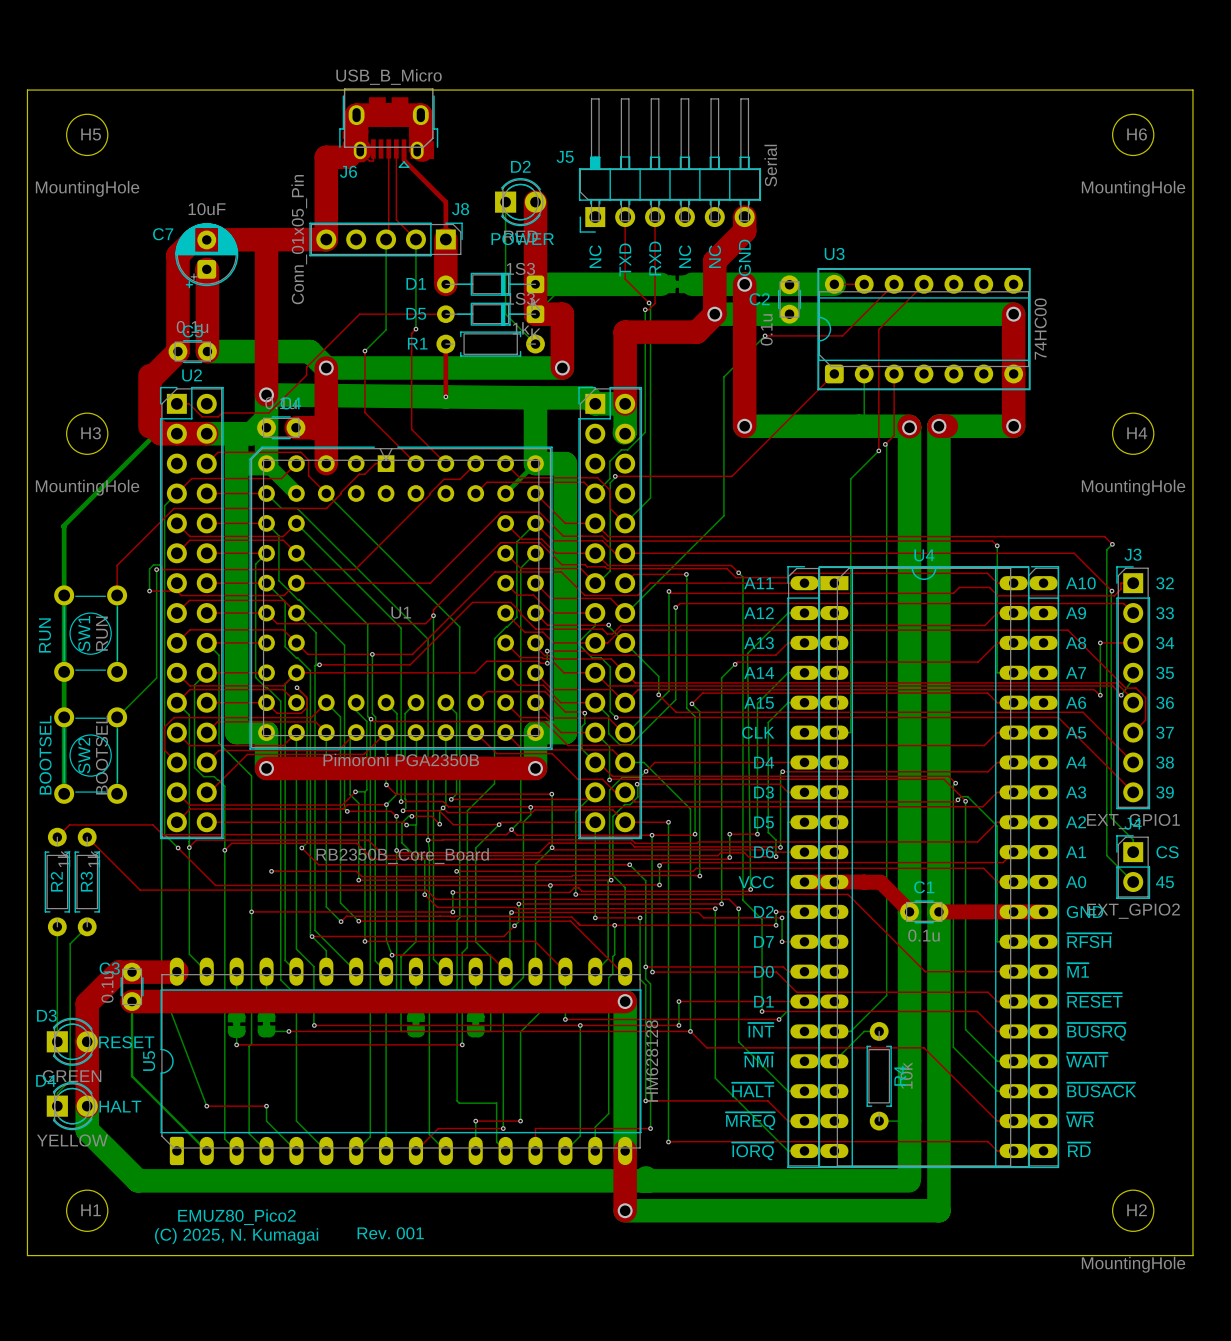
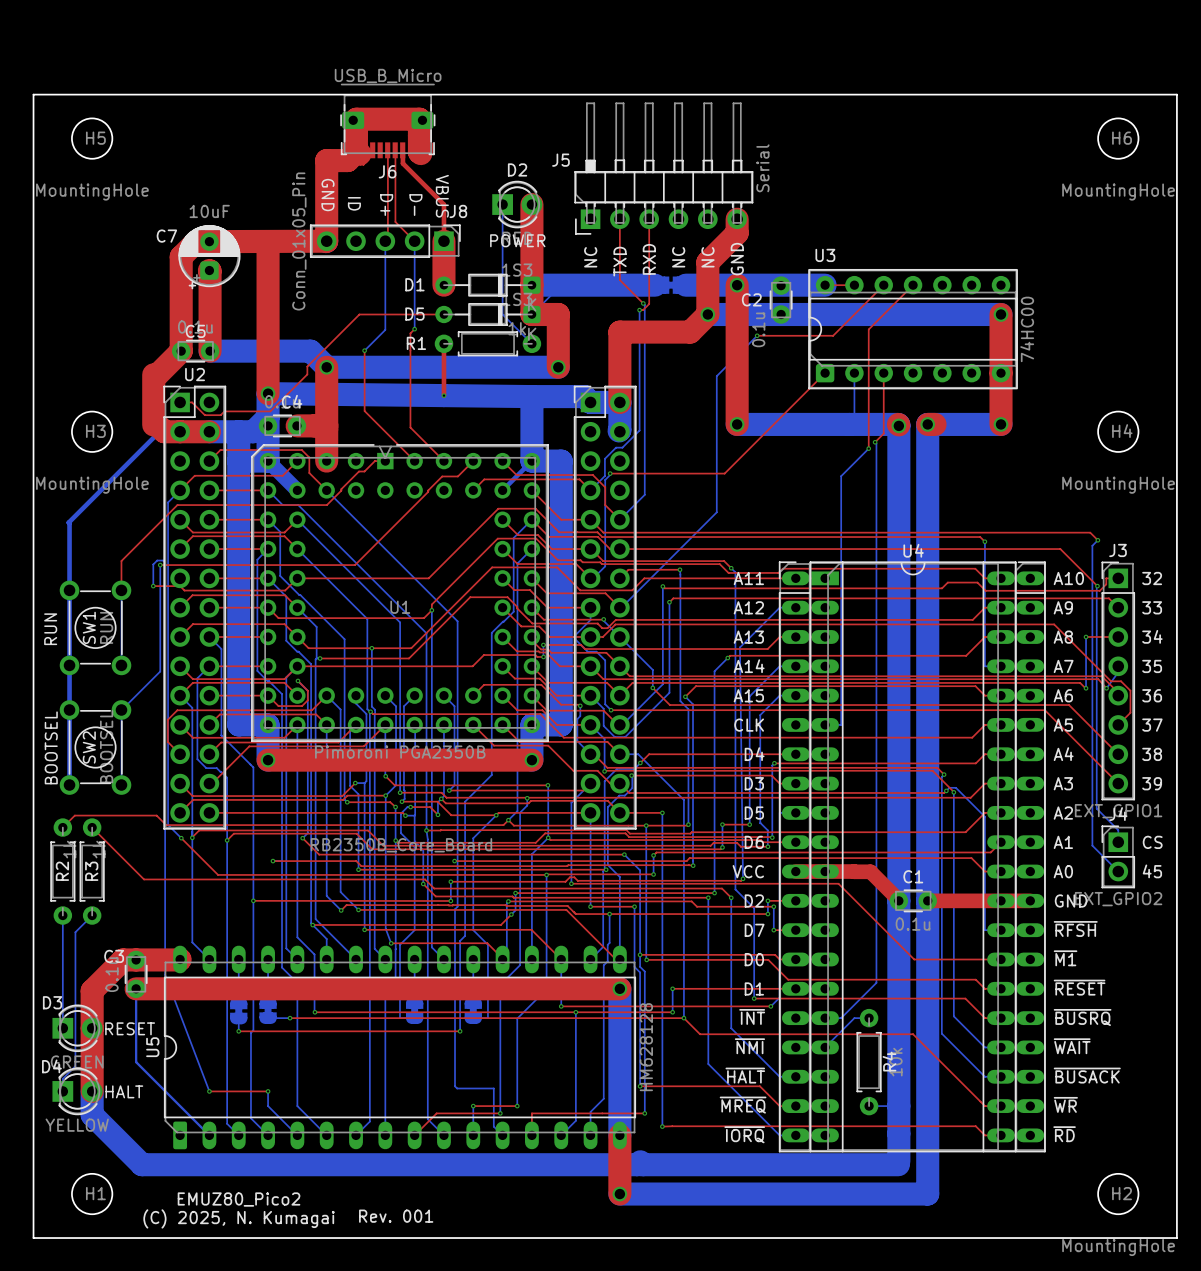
J6 footprint: [339, 88, 439, 168] -> [340, 83, 436, 159]
top track: (373, 149) (373, 160) (366, 158) -> none
J6 name position: J6 (348, 171) -> J6 (387, 171)
text: none -> GND (328, 195)
text: none -> VBUS (442, 196)
text: none -> D- (415, 205)
text: none -> ID (354, 203)
text: none -> D+ (386, 205)

